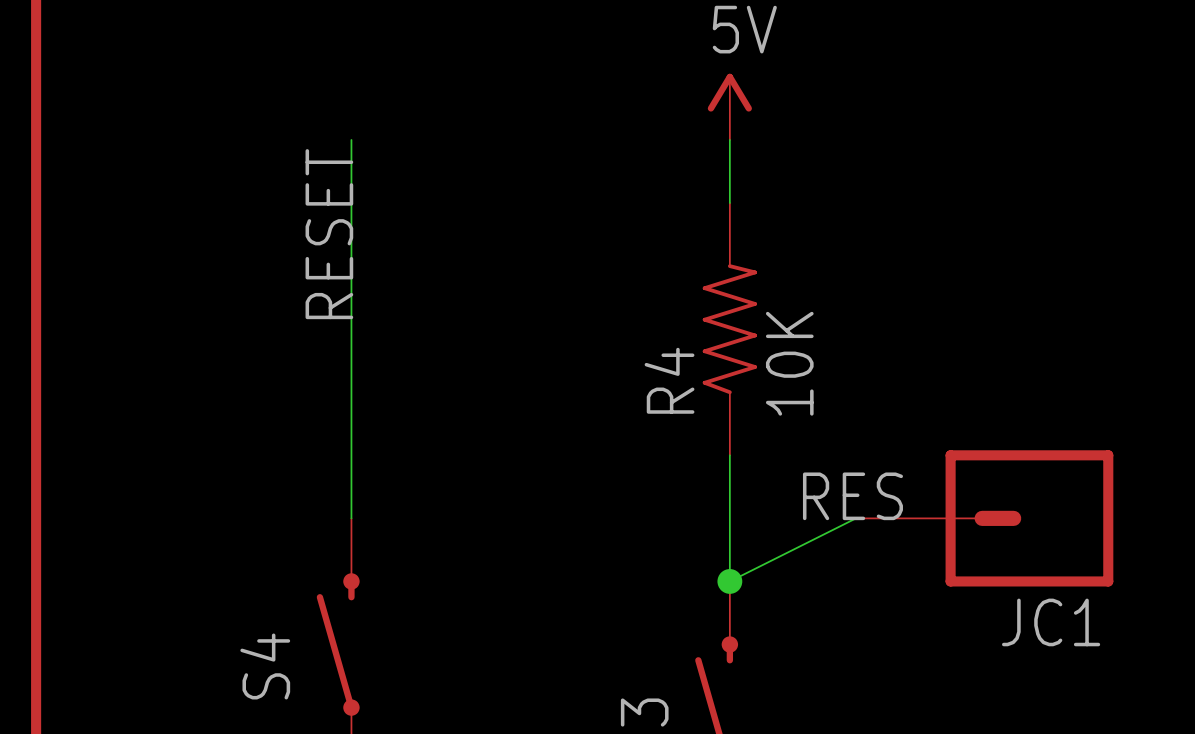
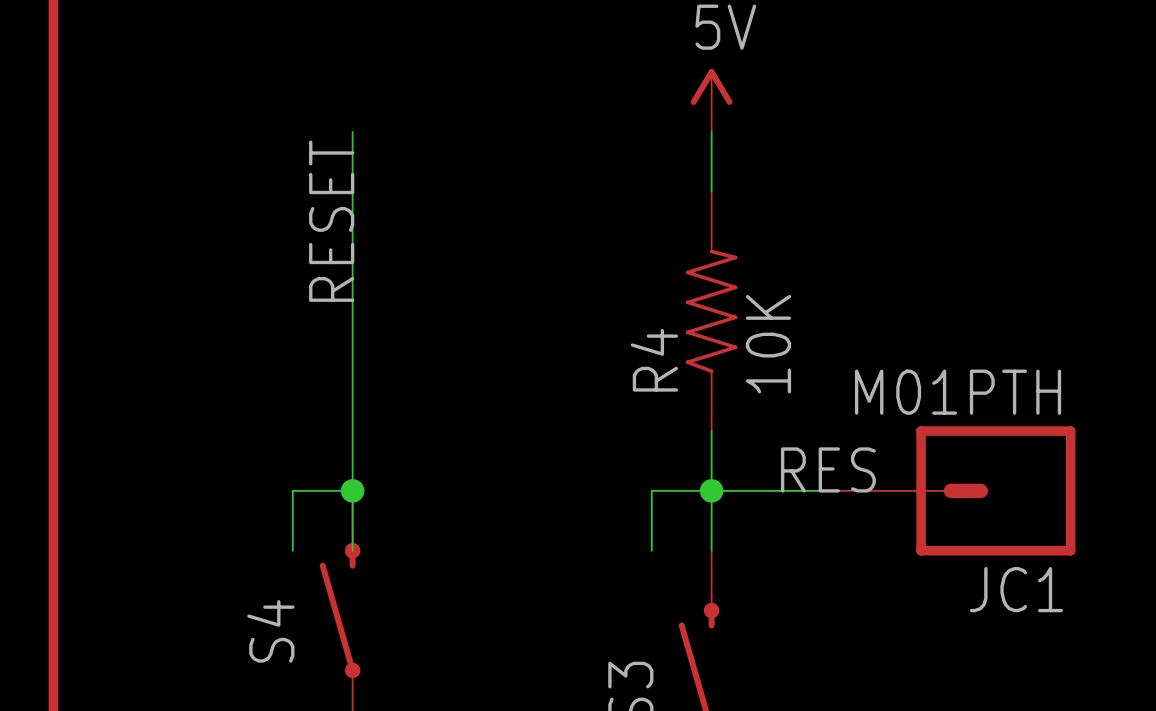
JC1 value: none -> M01PTH (958, 392)
junction: none -> (352, 490)
wire: (856, 518) (729, 581) -> (831, 490) (651, 490) (651, 550)
wire: none -> (292, 550) (292, 490) (352, 490) (352, 550)
junction position: (729, 581) -> (711, 490)

